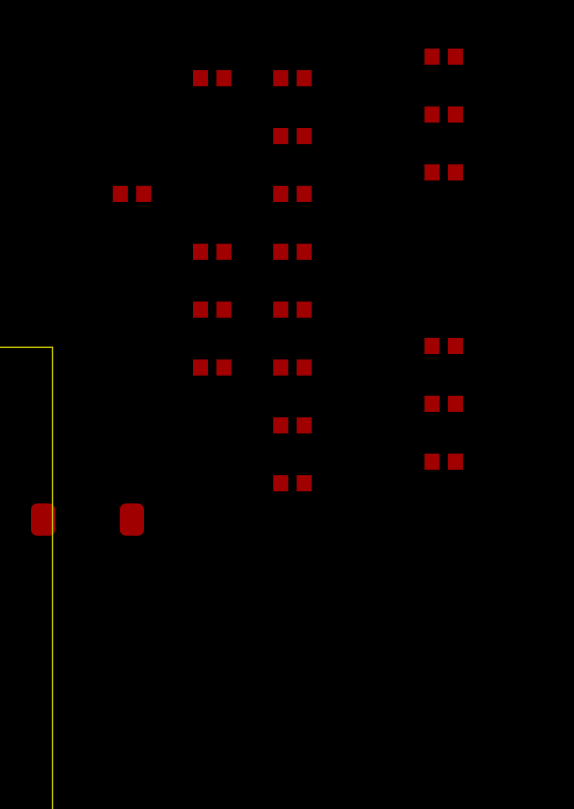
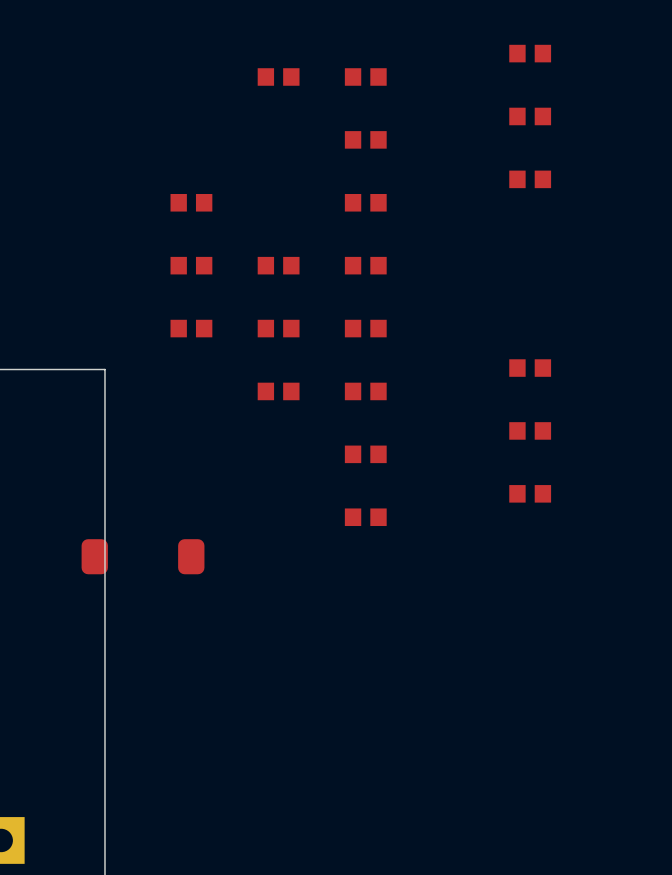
part: none -> (191, 265)
part: none -> (191, 328)

